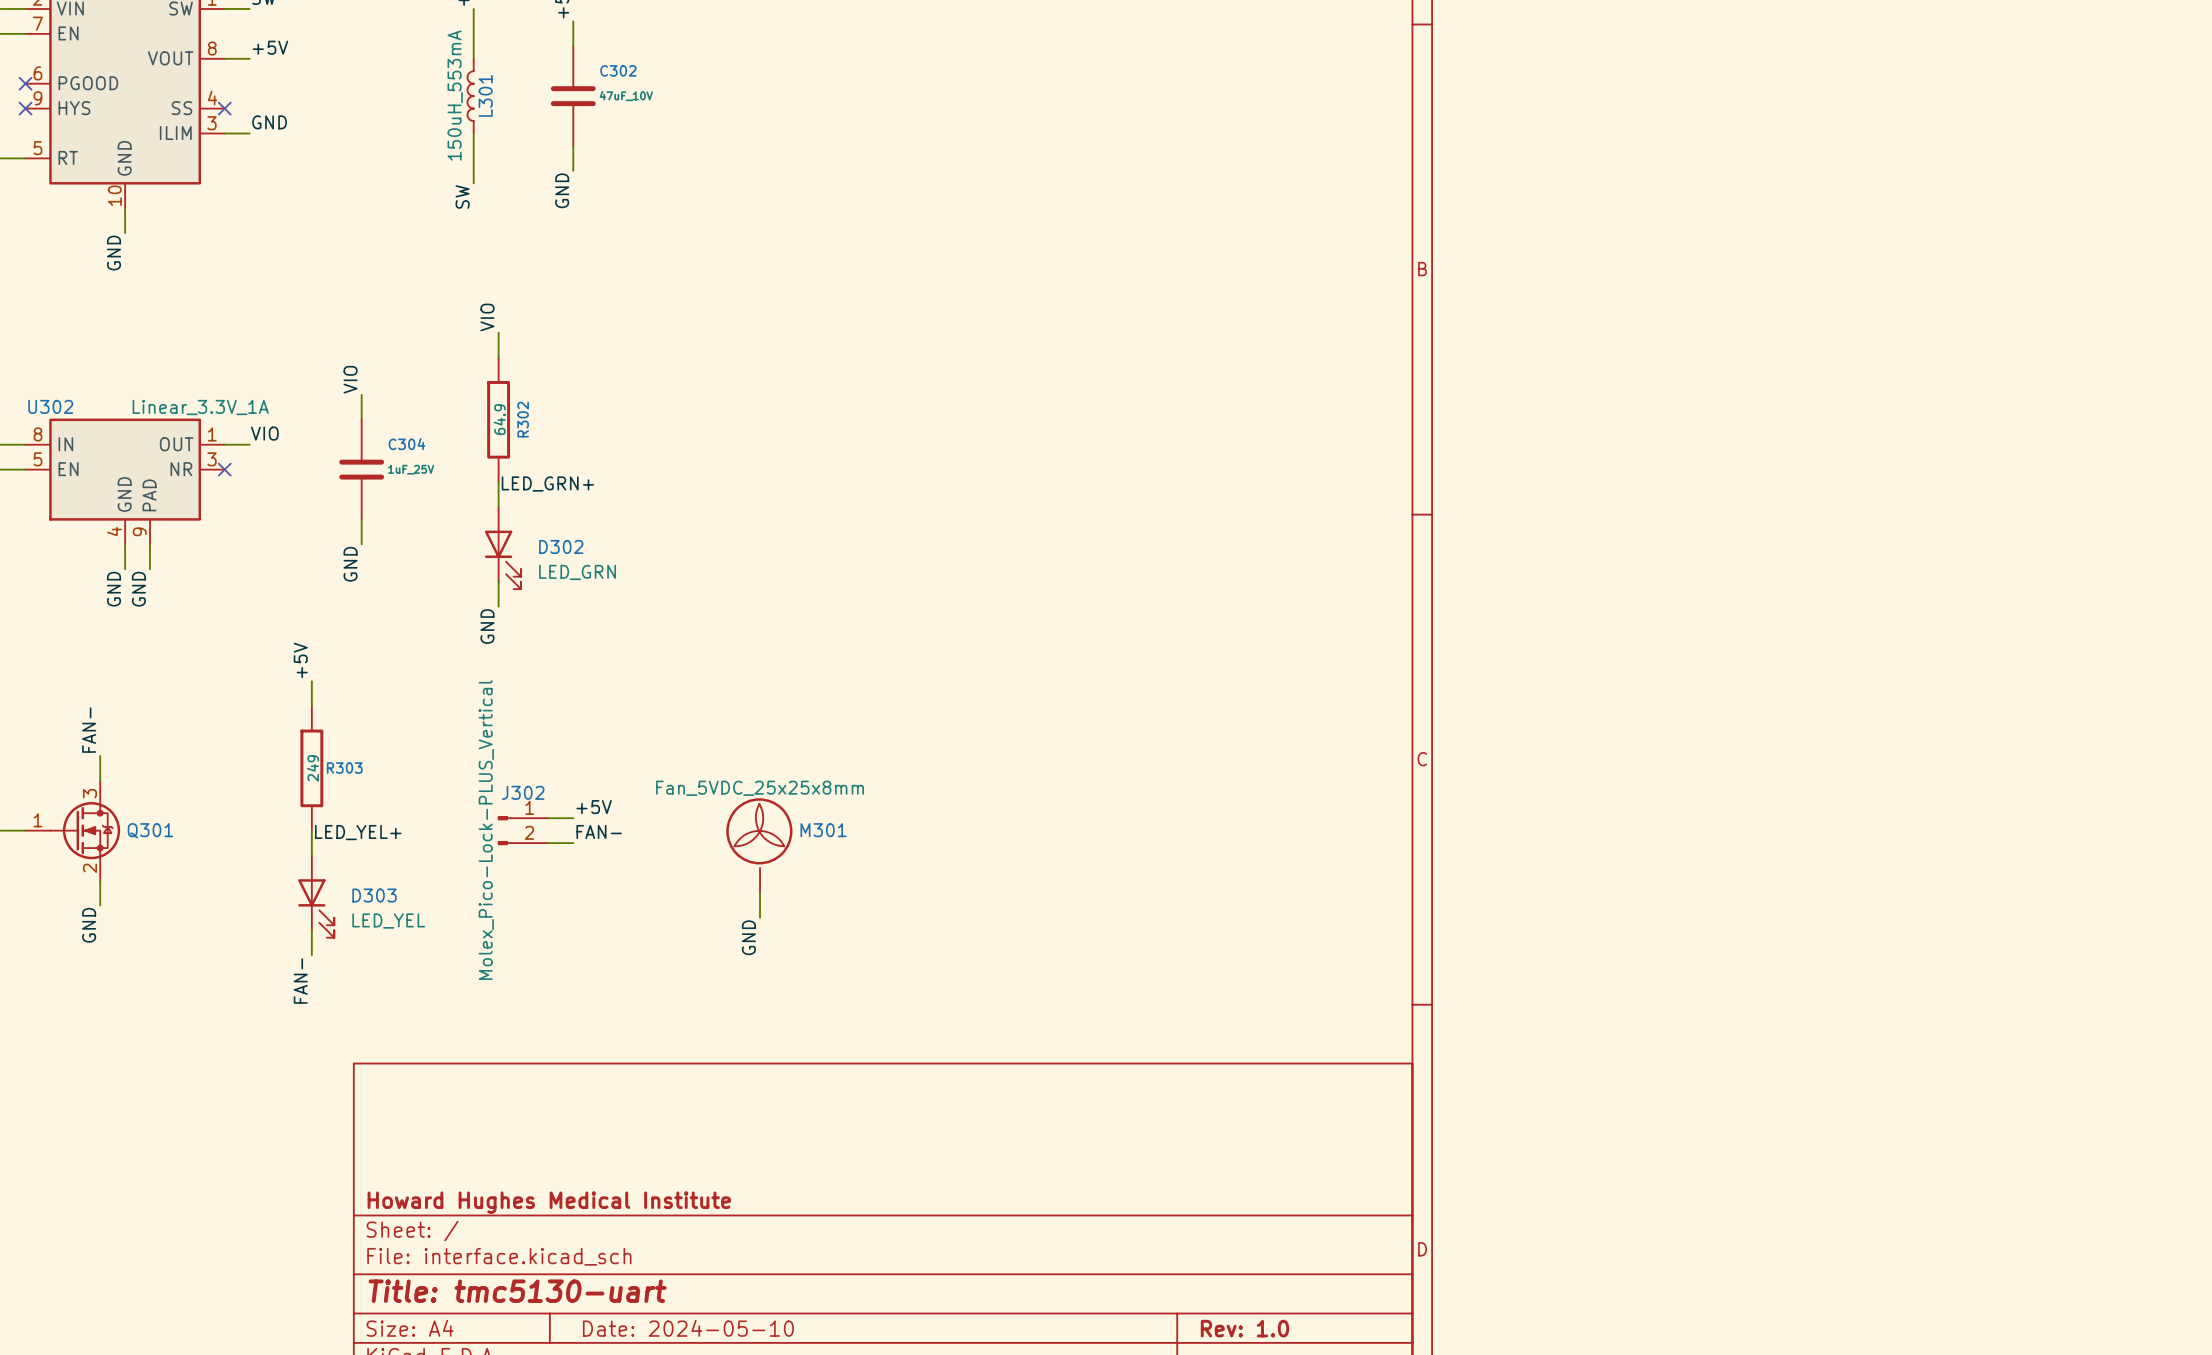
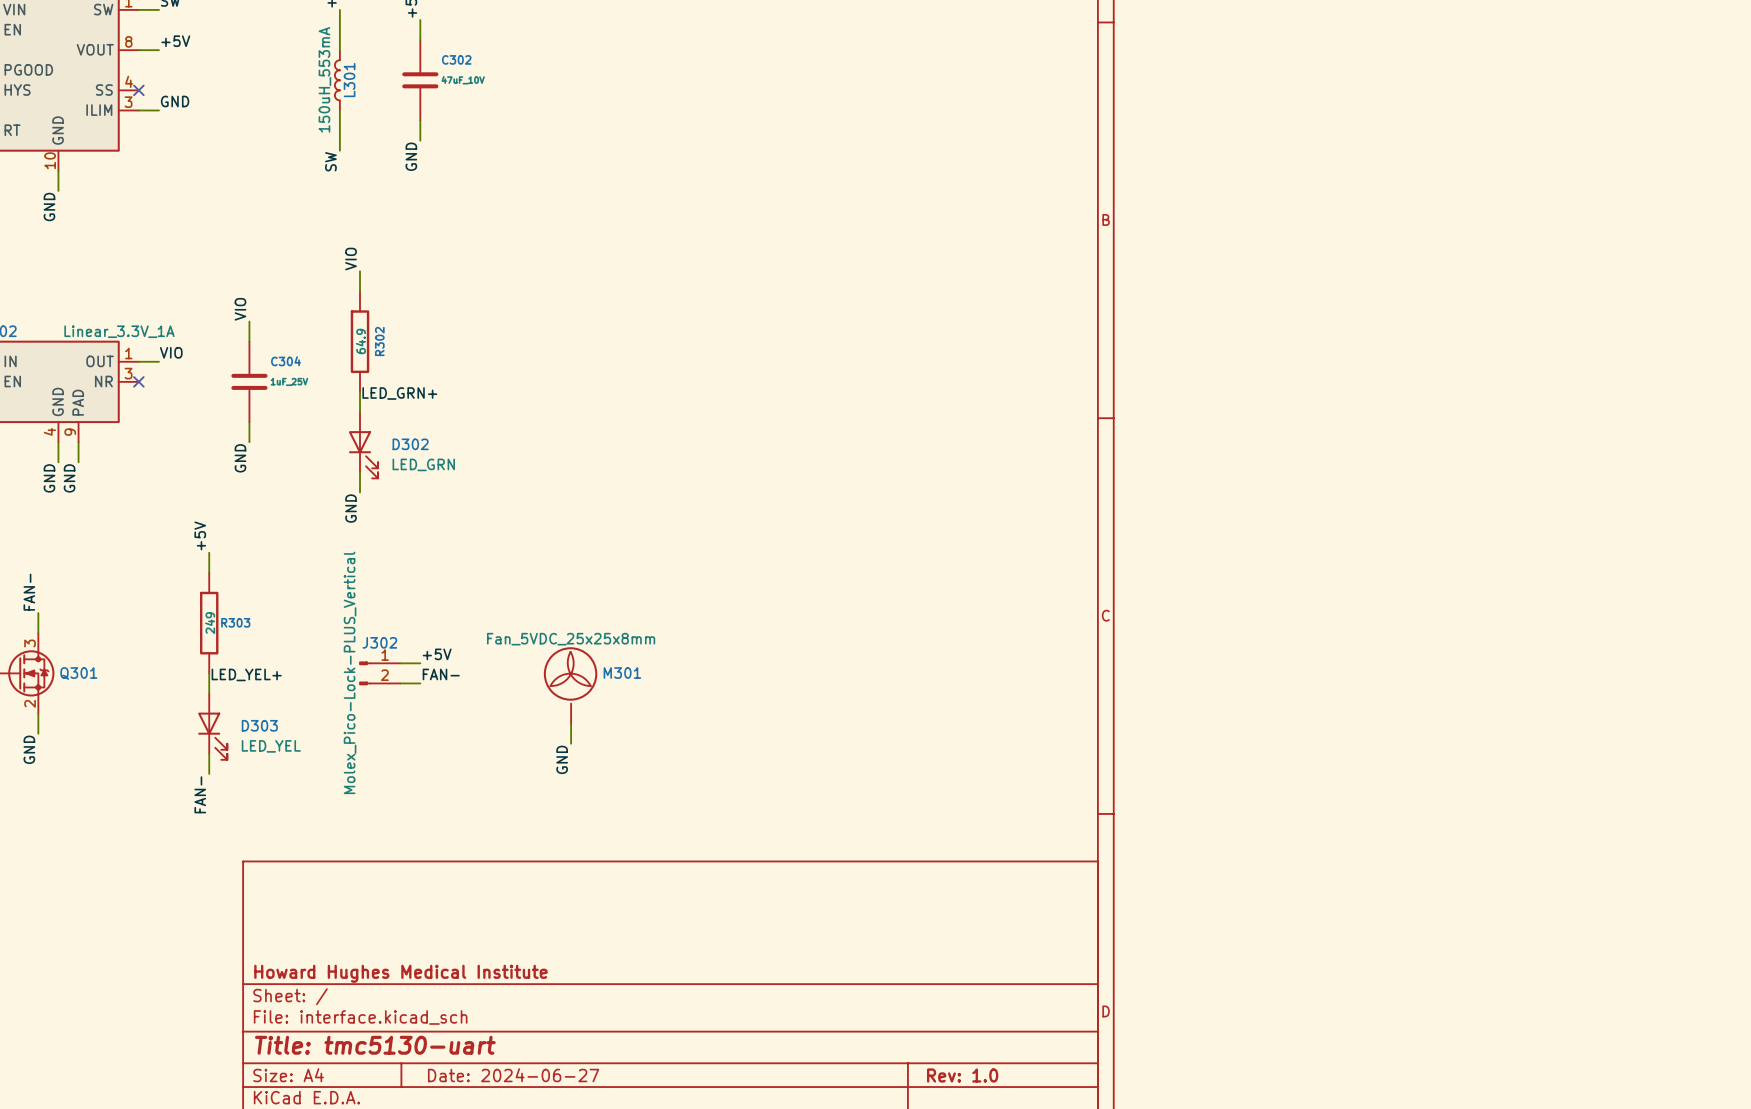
title block: Date: 2024-05-10 (688, 1328) -> Date: 2024-06-27 (513, 1075)

